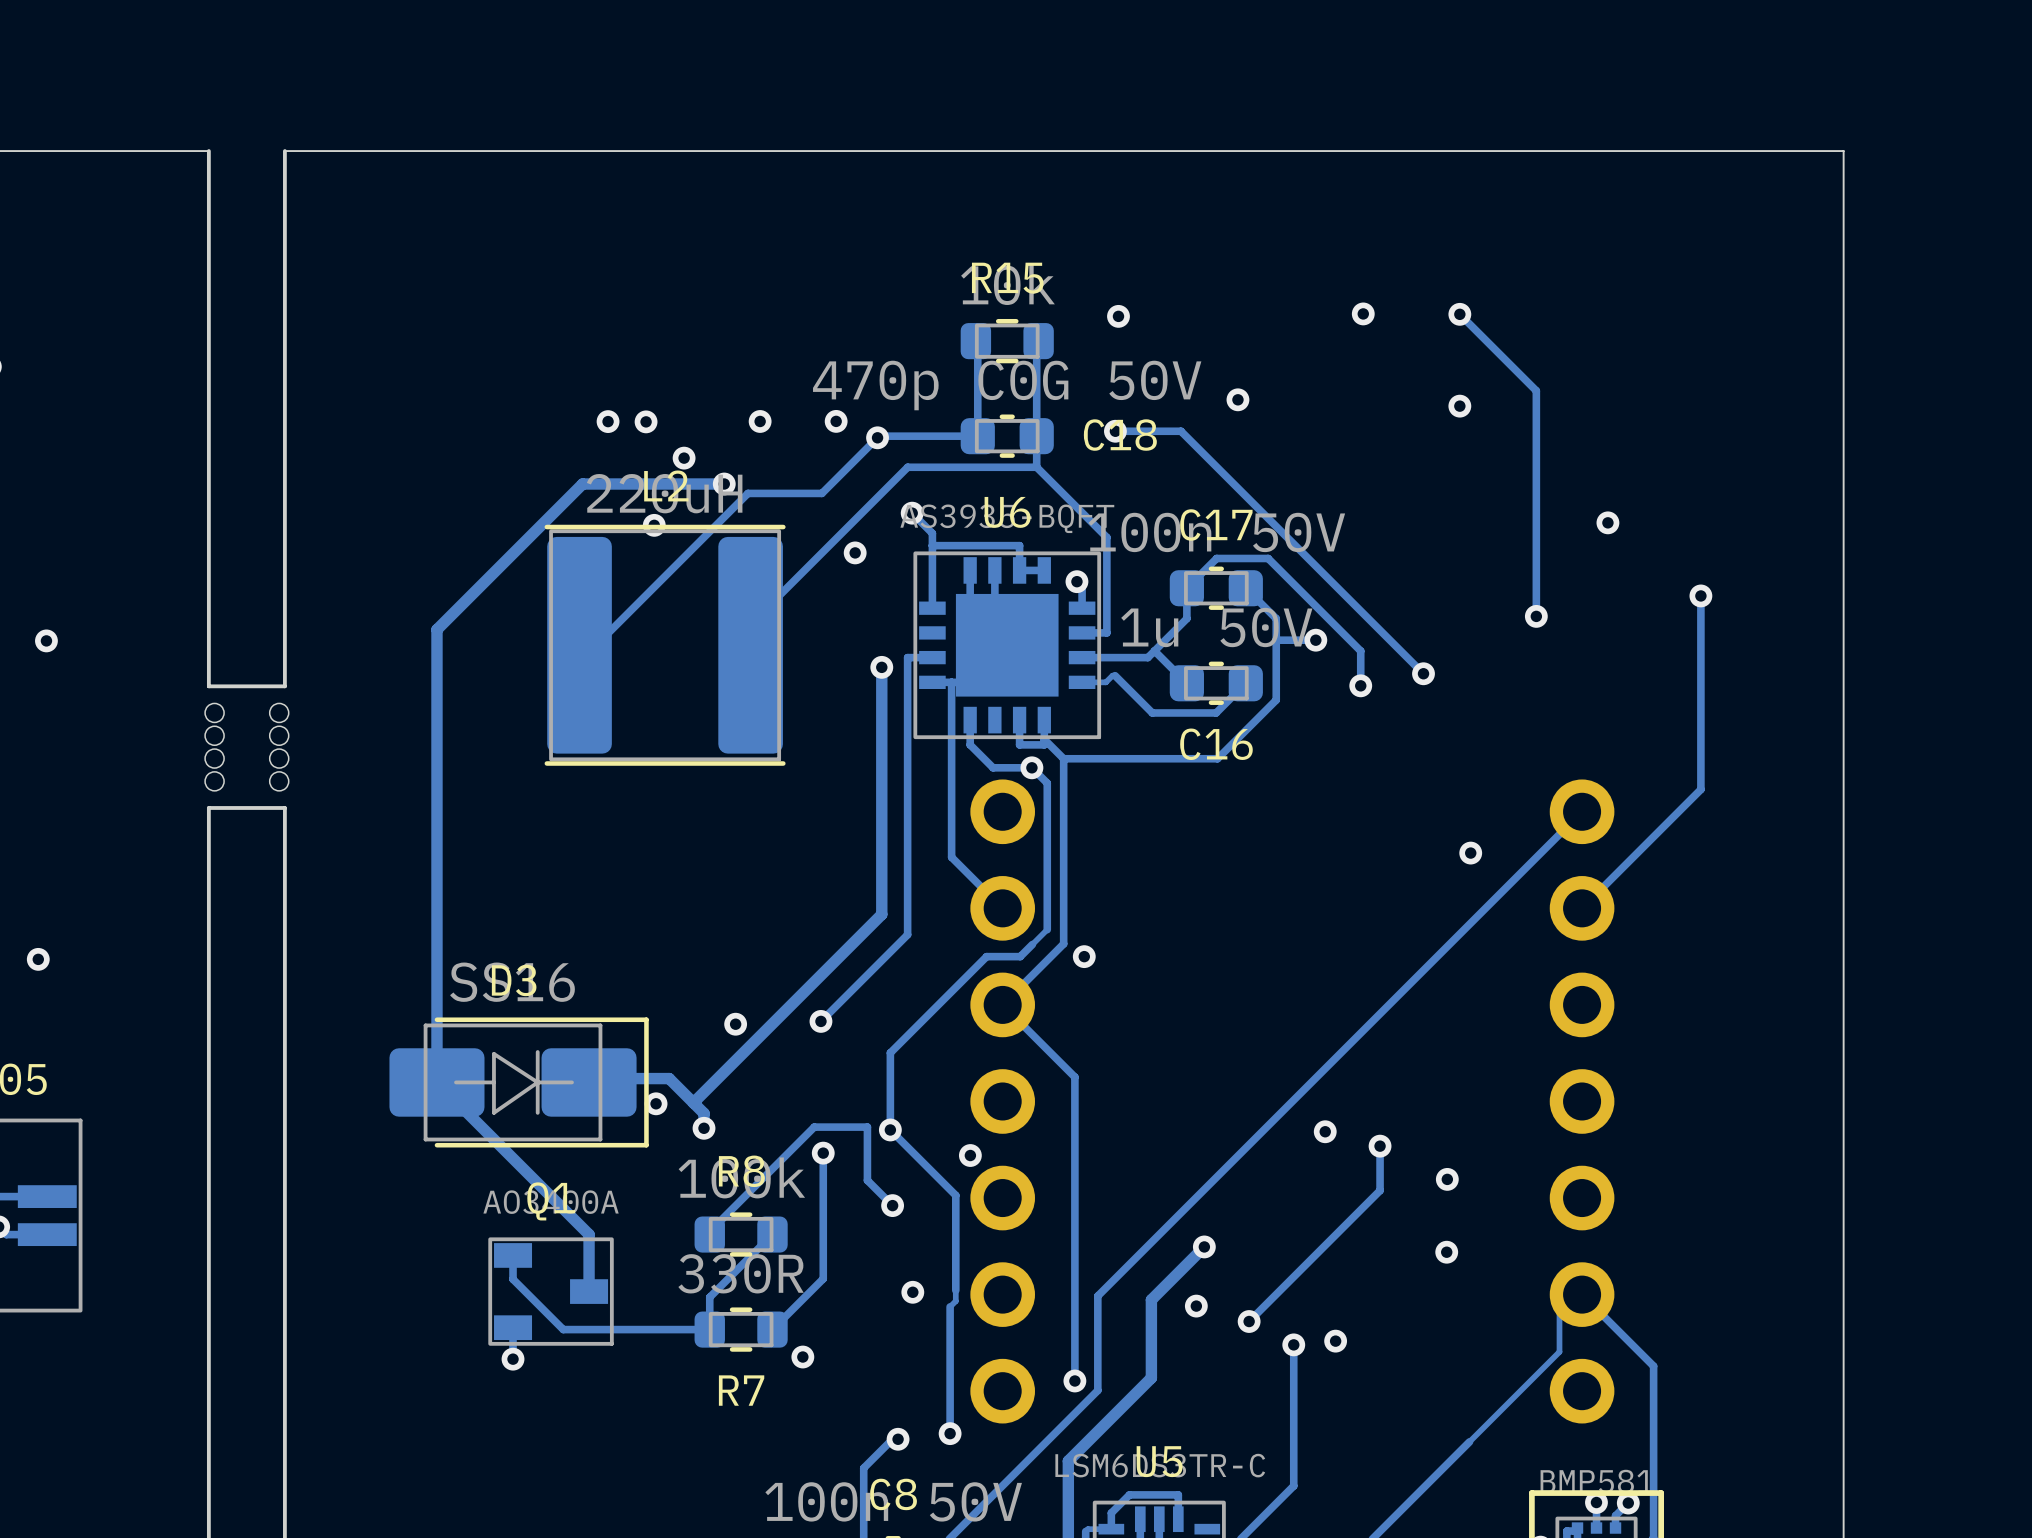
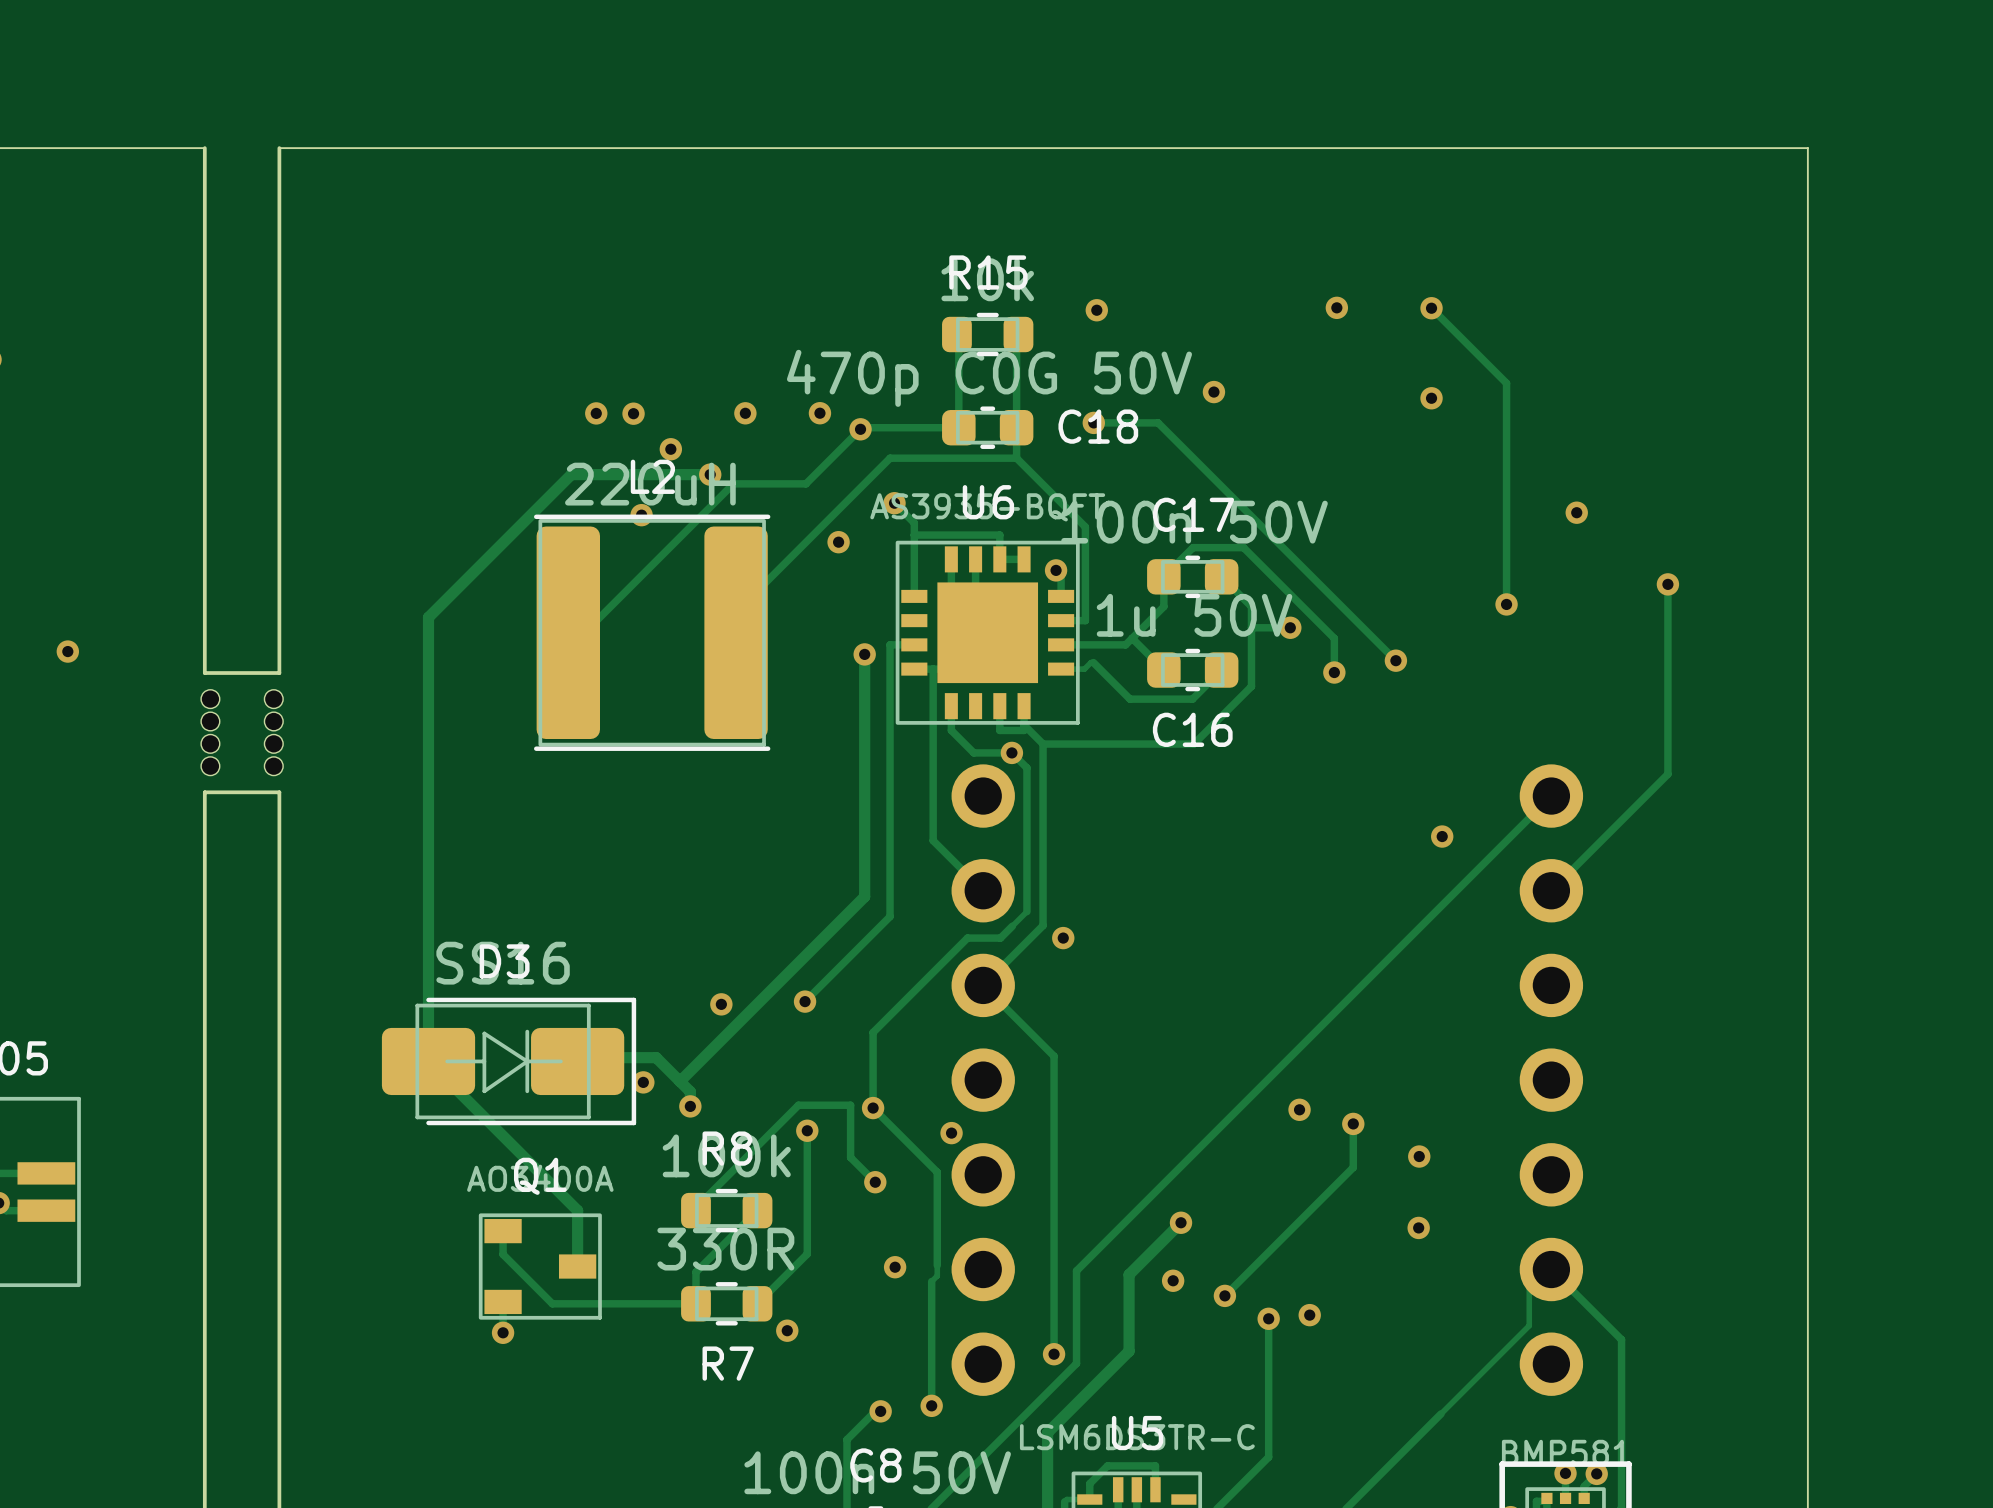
via position: (46, 640) -> (67, 651)
via: (38, 959) -> none

